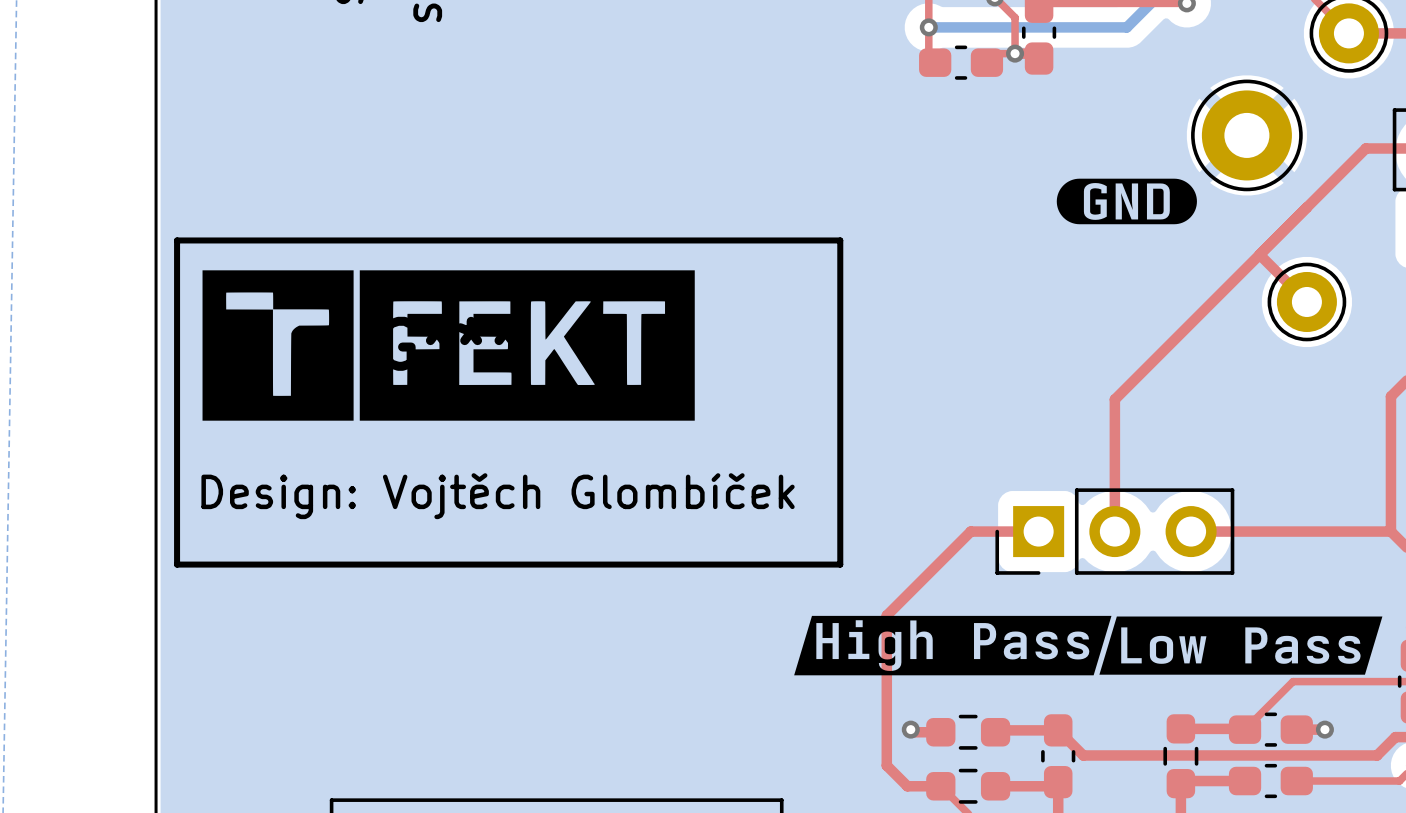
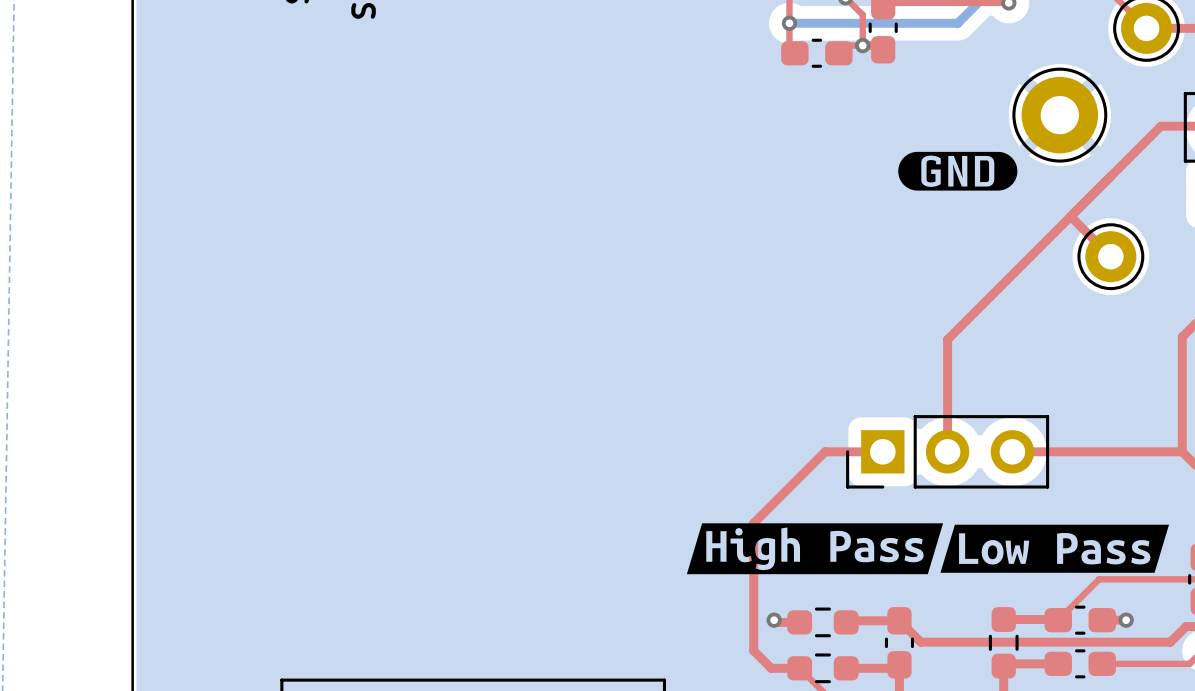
line: (177, 240) (840, 240) (840, 564) (177, 564) (177, 240) -> none
part: (448, 345) -> none
text: Design: Vojtěch Glombíček (498, 496) -> none
drawing shape: [794, 615, 1112, 676] -> [686, 523, 944, 575]
drawing shape: [1099, 616, 1383, 675] -> [940, 524, 1169, 573]

